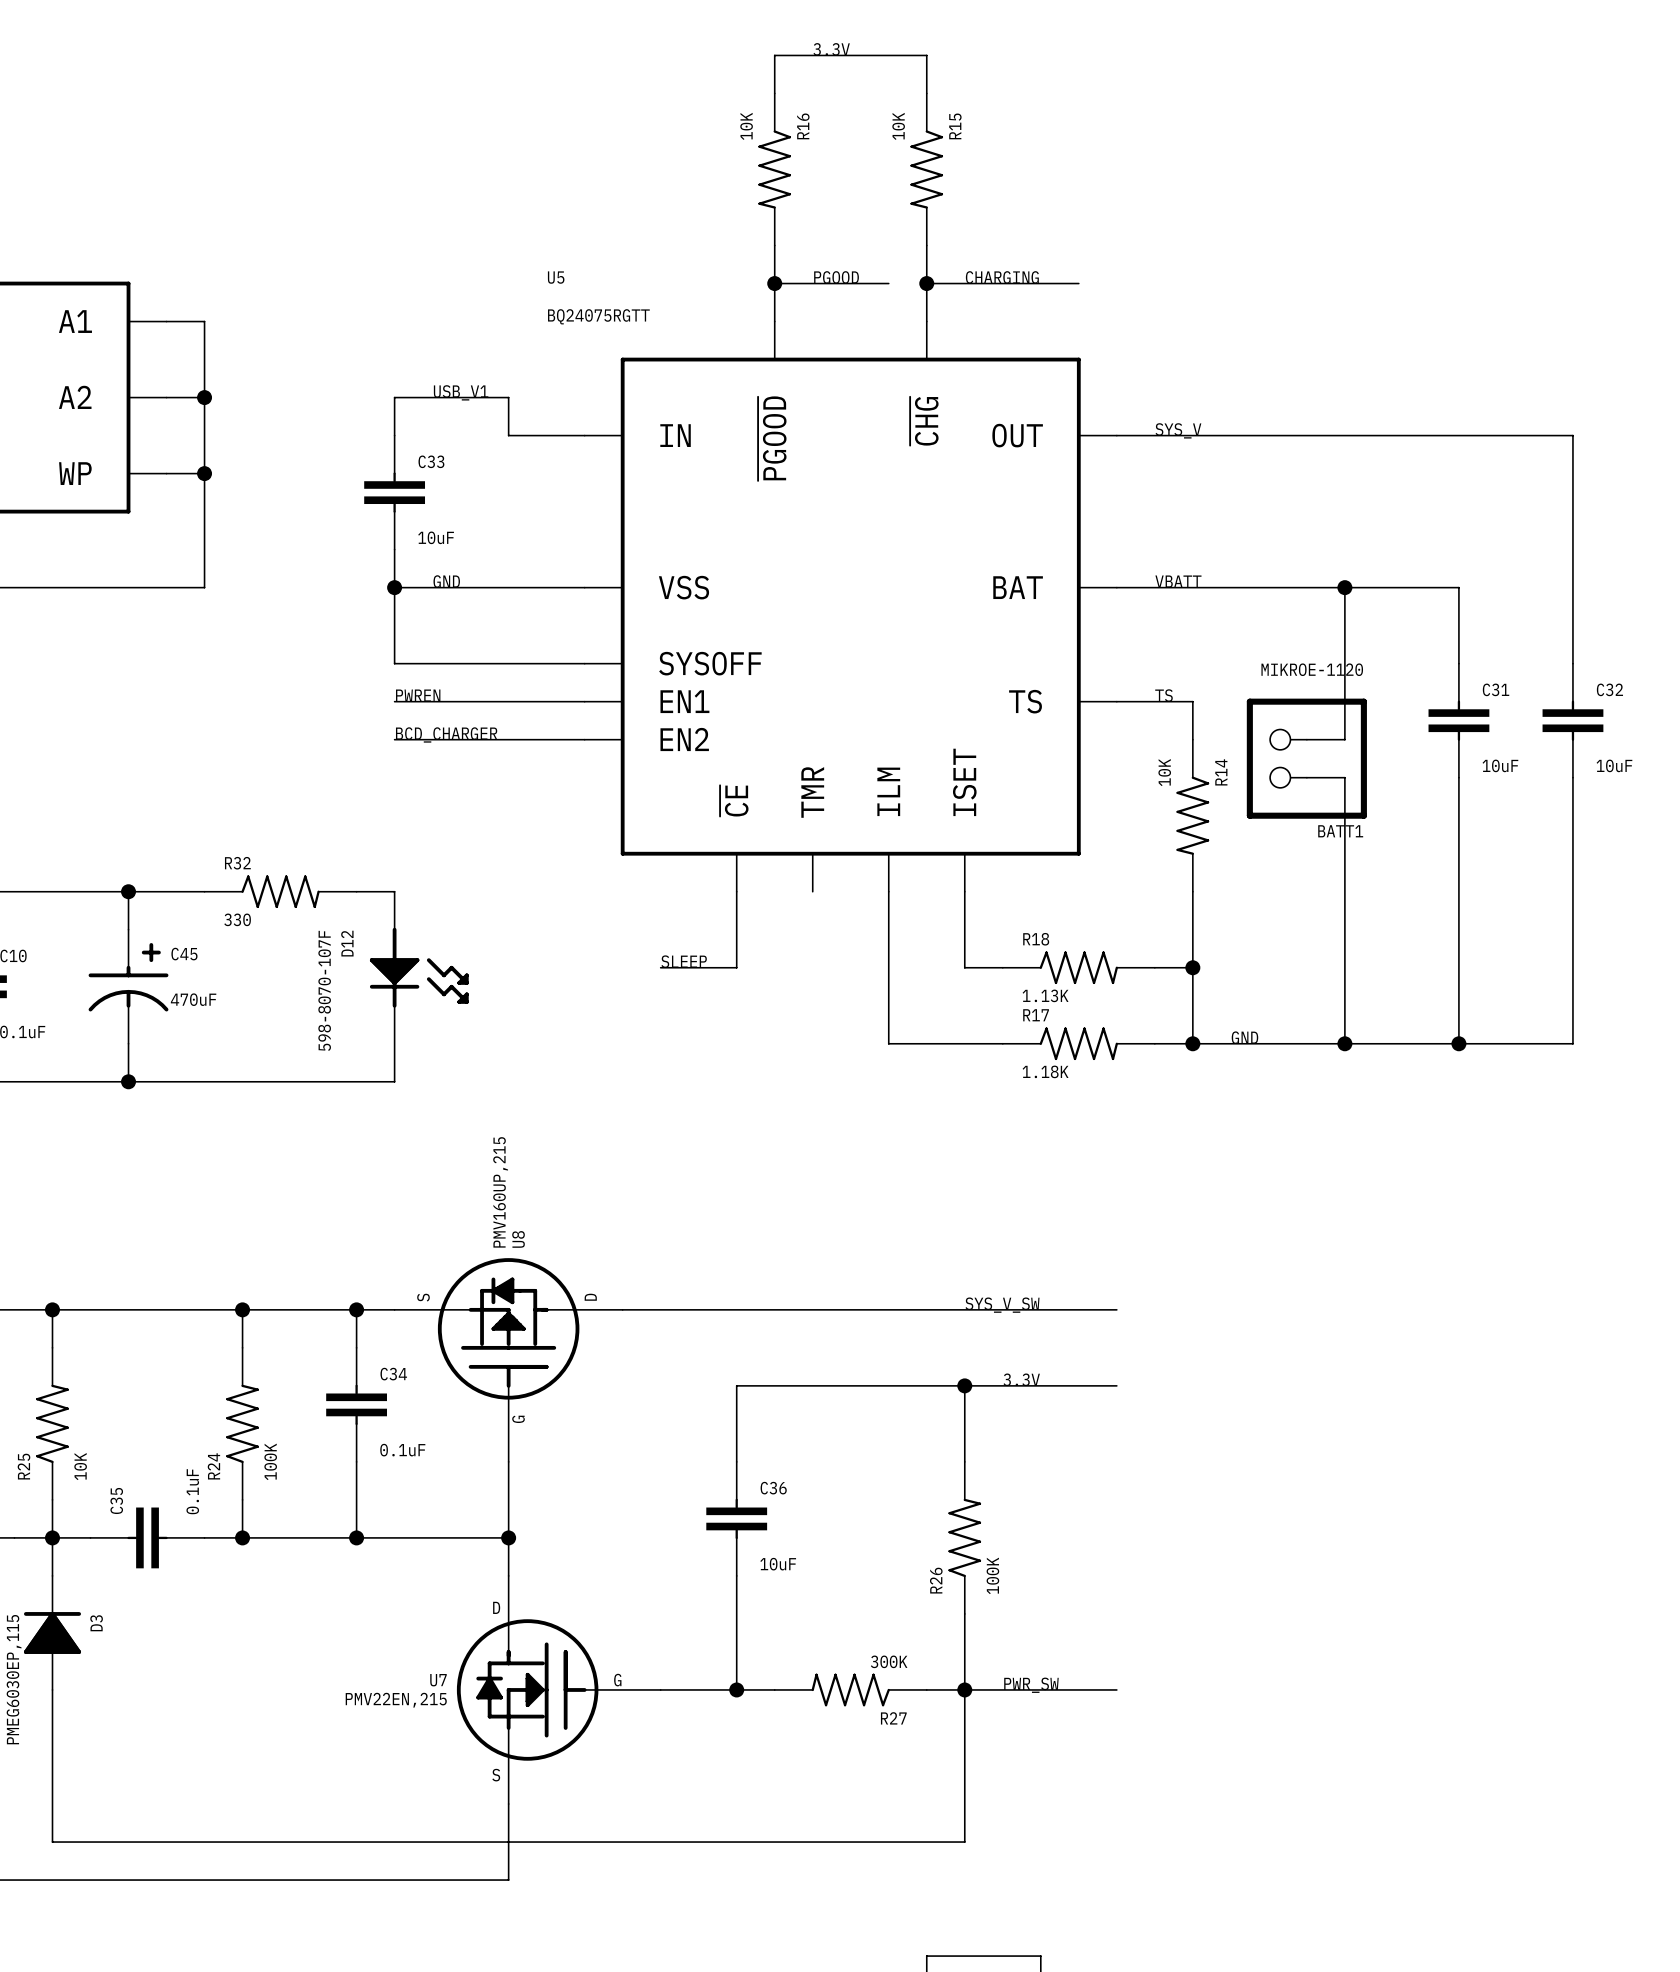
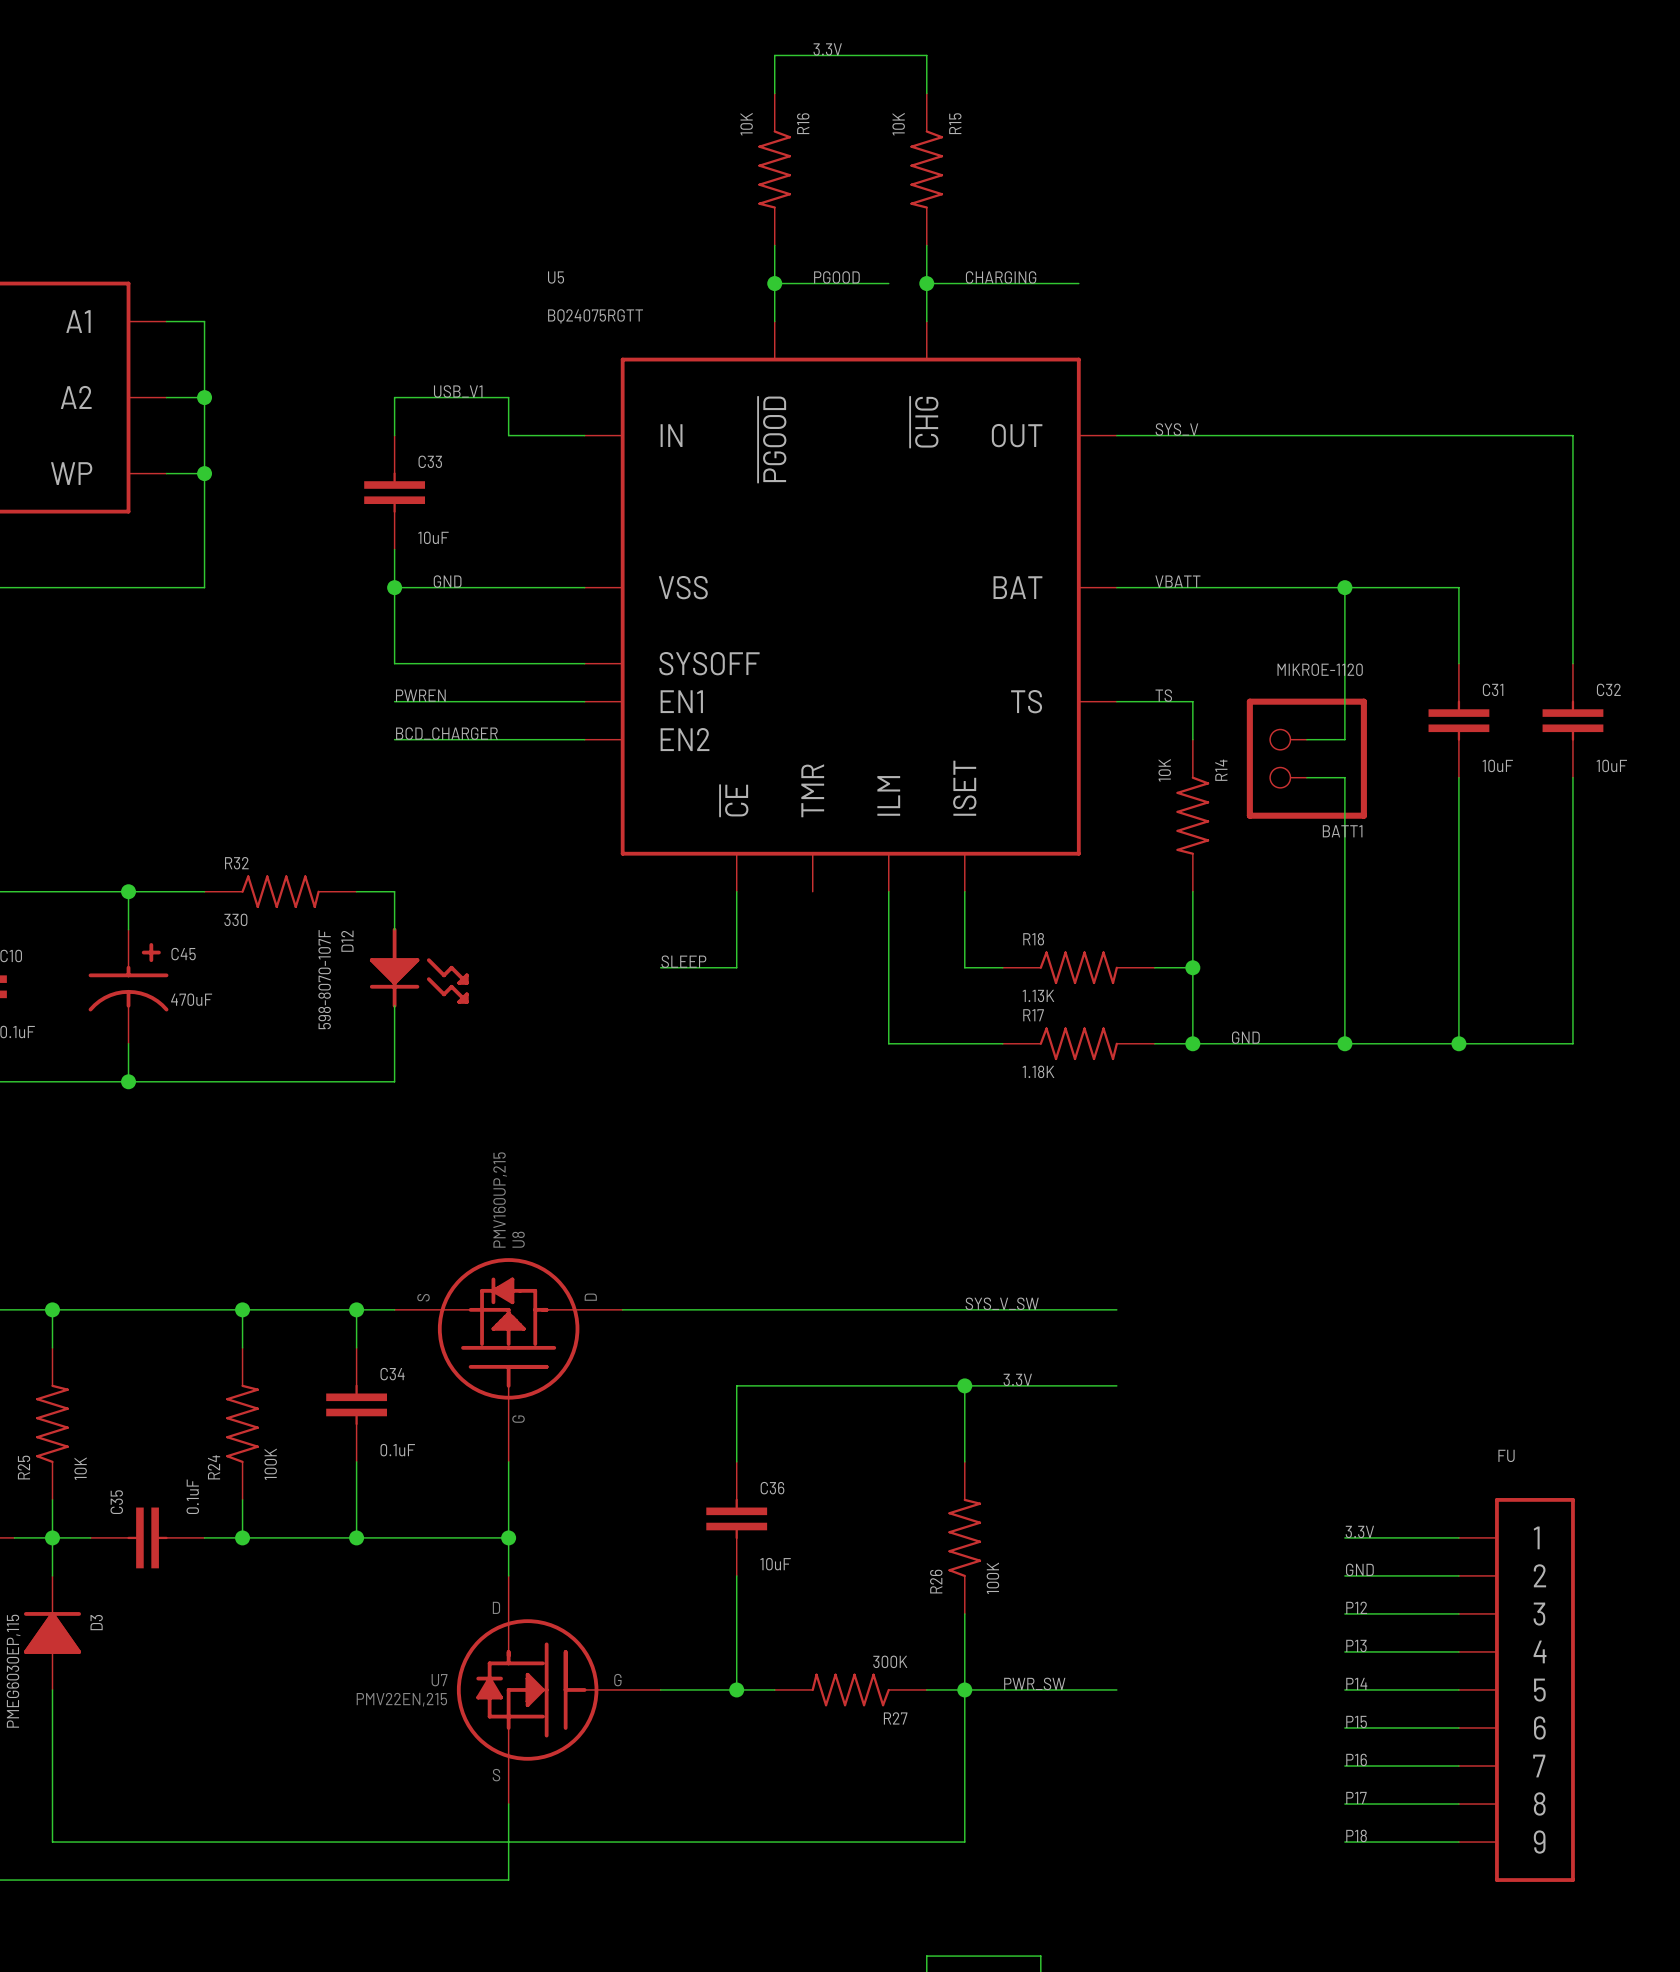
label: none -> 3.3V (1359, 1531)
wire: none -> (1344, 1537) (1458, 1537)
label: none -> GND (1359, 1569)
wire: none -> (1344, 1575) (1458, 1575)
label: none -> P12 (1356, 1607)
wire: none -> (1344, 1613) (1458, 1613)
label: none -> P13 (1356, 1645)
wire: none -> (1344, 1651) (1458, 1651)
label: none -> P14 (1356, 1683)
wire: none -> (1344, 1689) (1458, 1689)
FU: none -> (1516, 1689)
label: none -> P15 (1356, 1721)
wire: none -> (1344, 1727) (1458, 1727)
label: none -> P16 (1356, 1759)
wire: none -> (1344, 1766) (1458, 1766)
label: none -> P17 (1356, 1797)
wire: none -> (1344, 1804) (1458, 1804)
label: none -> P18 (1356, 1835)
wire: none -> (1344, 1842) (1458, 1842)

